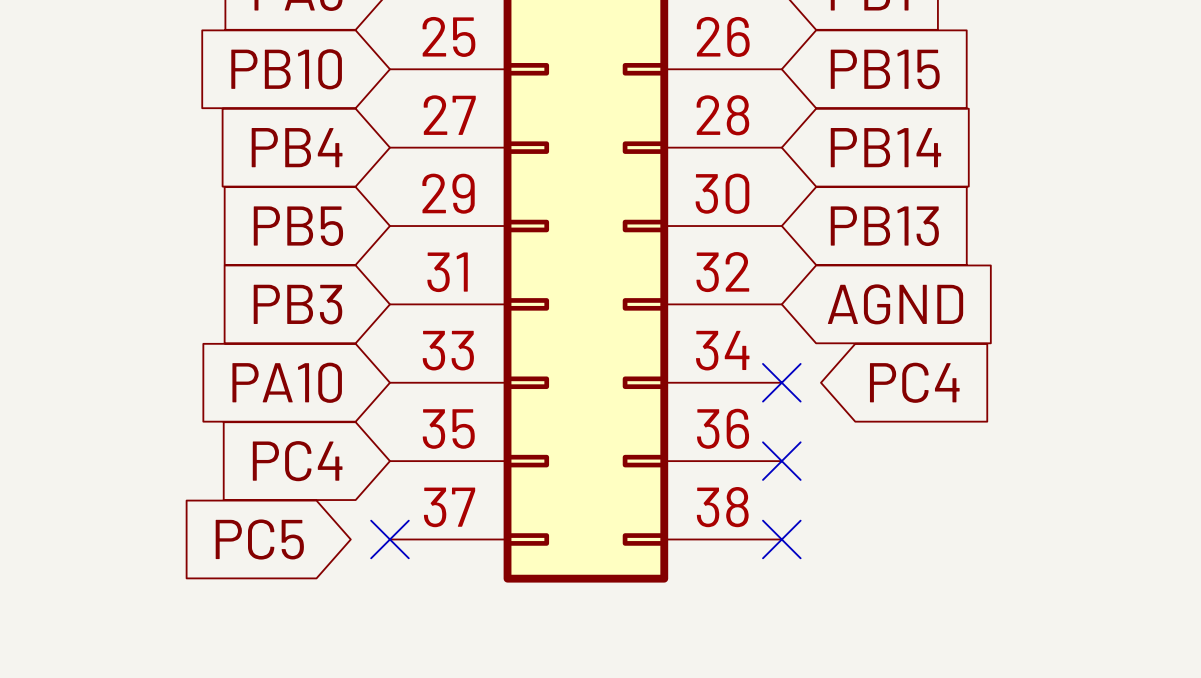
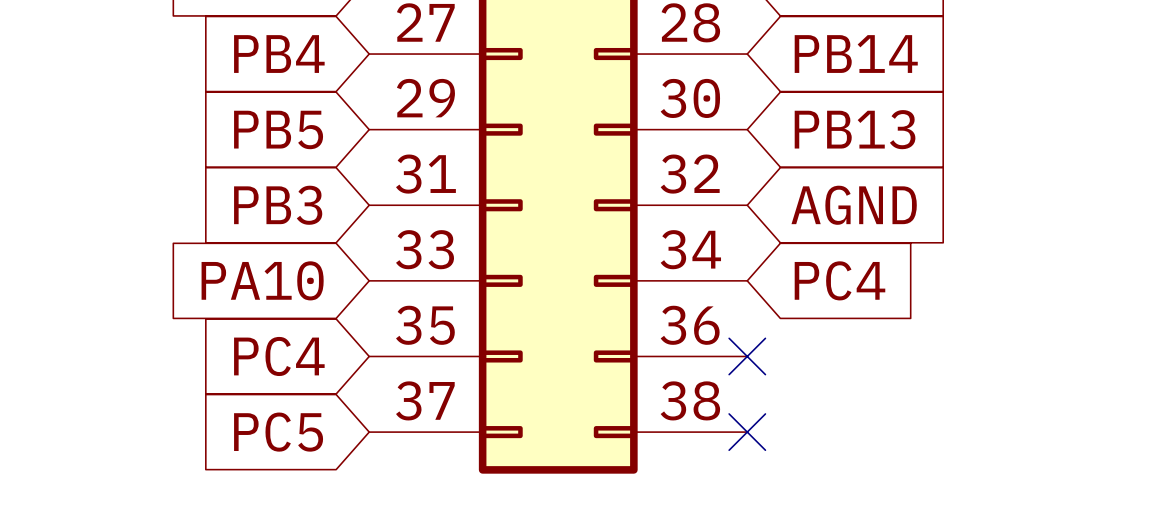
no-connect mark: (781, 382) -> none
global label position: PC4 (914, 382) -> PC4 (839, 280)
global label position: PC5 (259, 539) -> PC5 (278, 432)
no-connect mark: (389, 539) -> none

